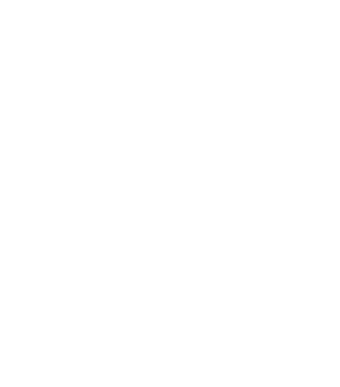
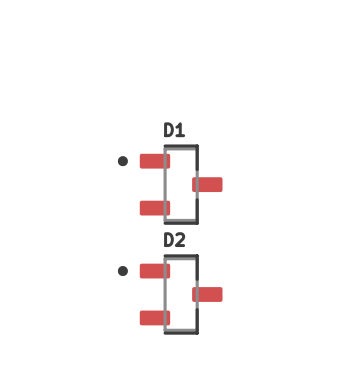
D1: none -> (170, 184)
D2: none -> (170, 294)

